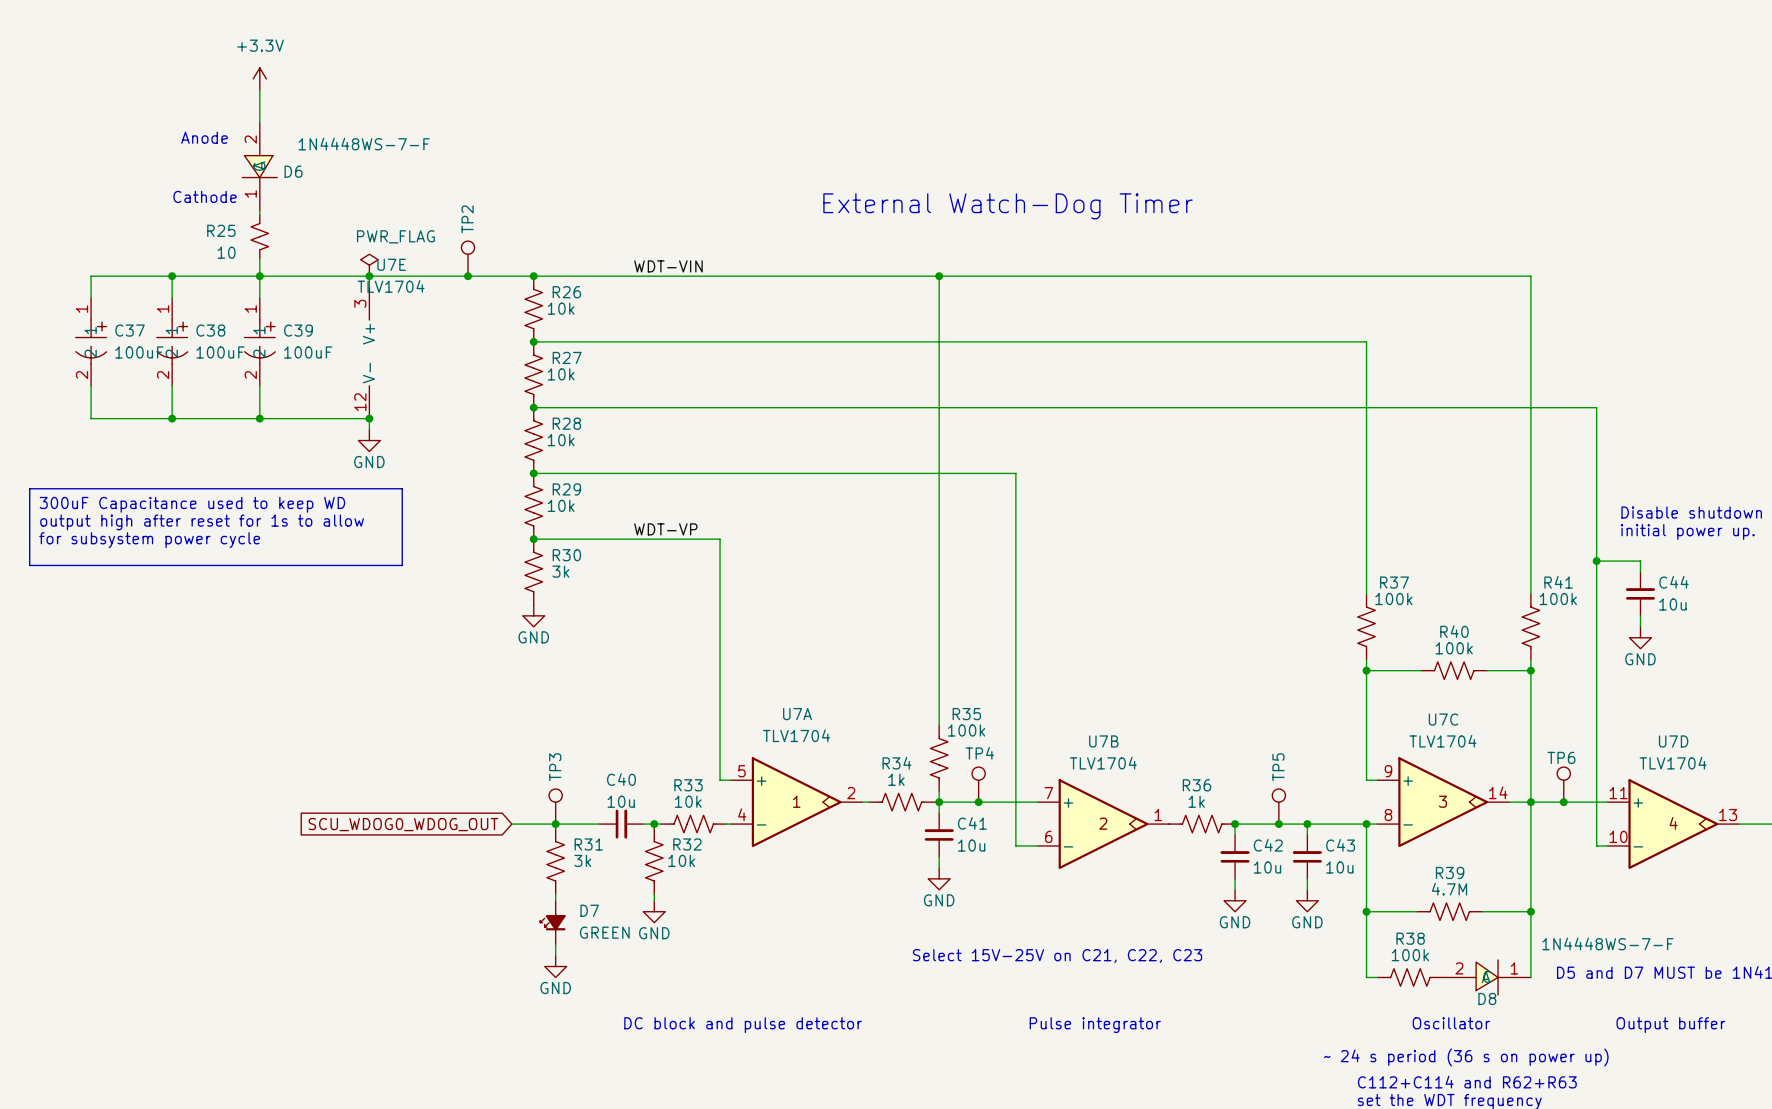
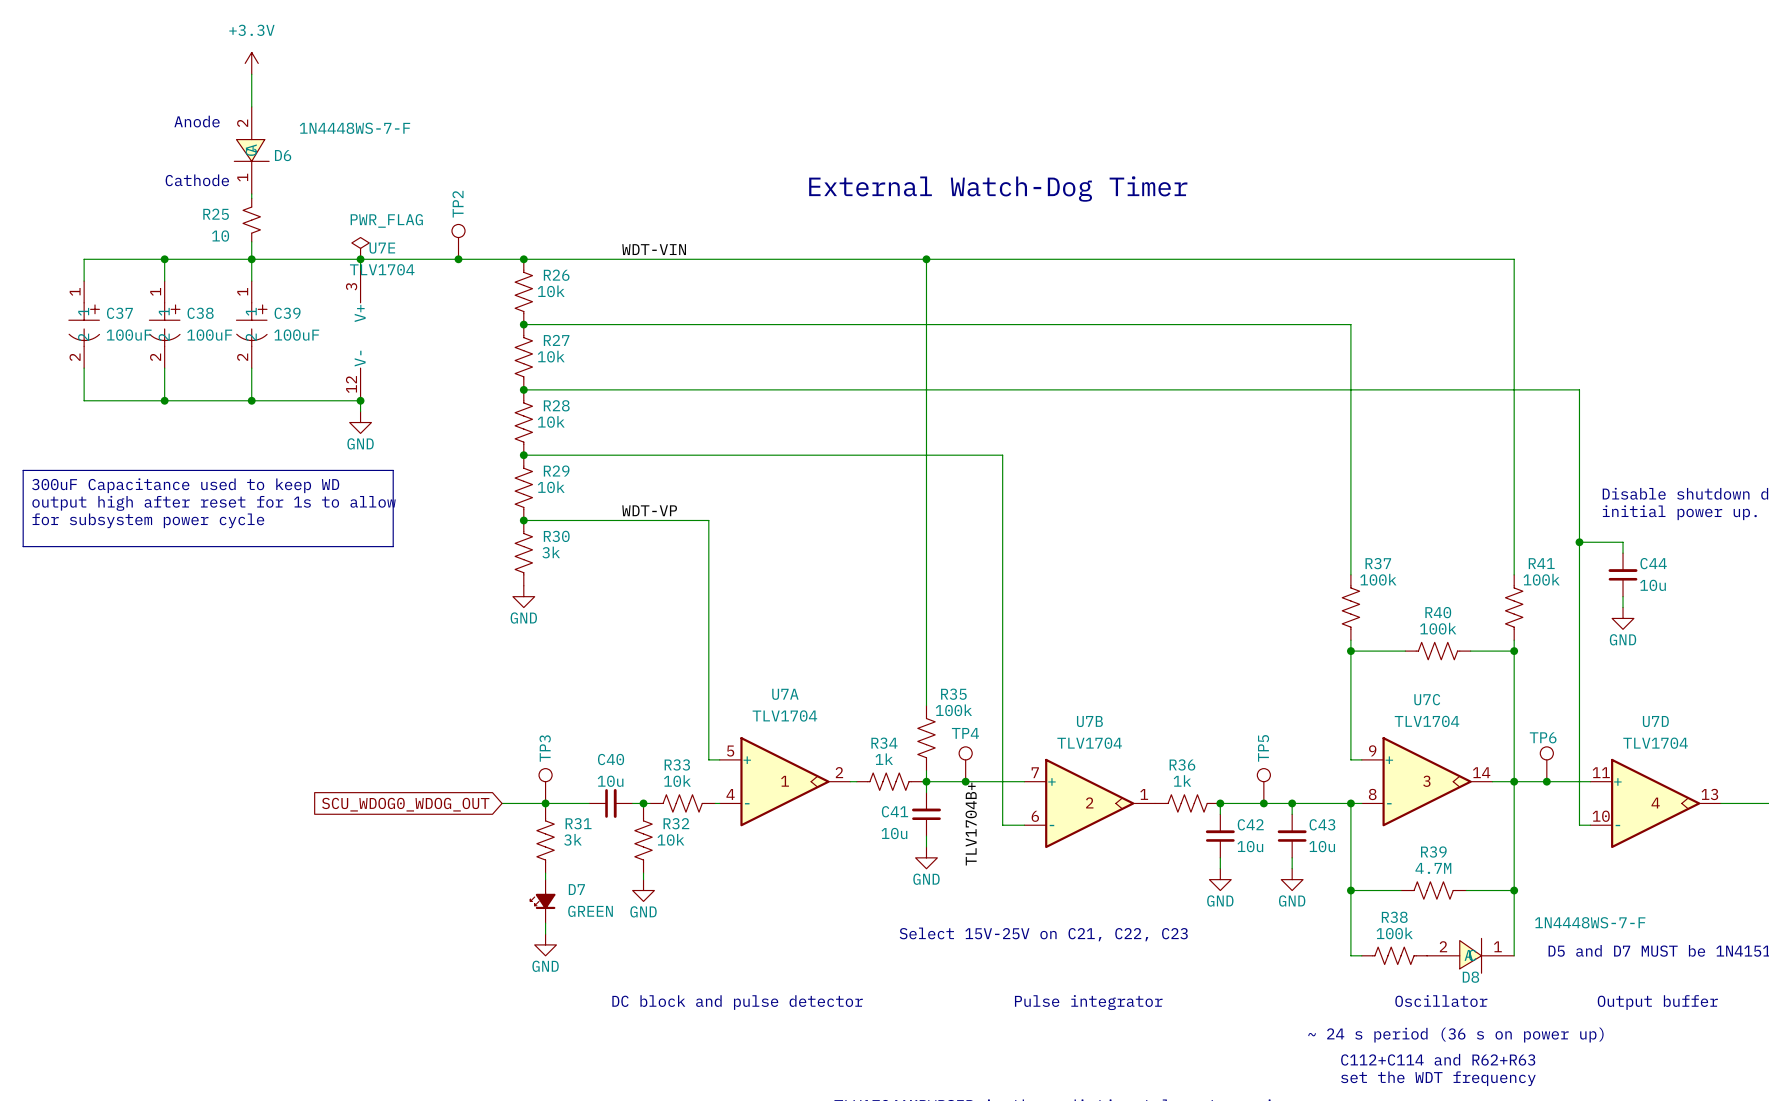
C41 name position: C41 (972, 823) -> C41 (894, 811)
C41 value position: 10u (971, 845) -> 10u (894, 833)
label: none -> TLV1704B+ (971, 824)

